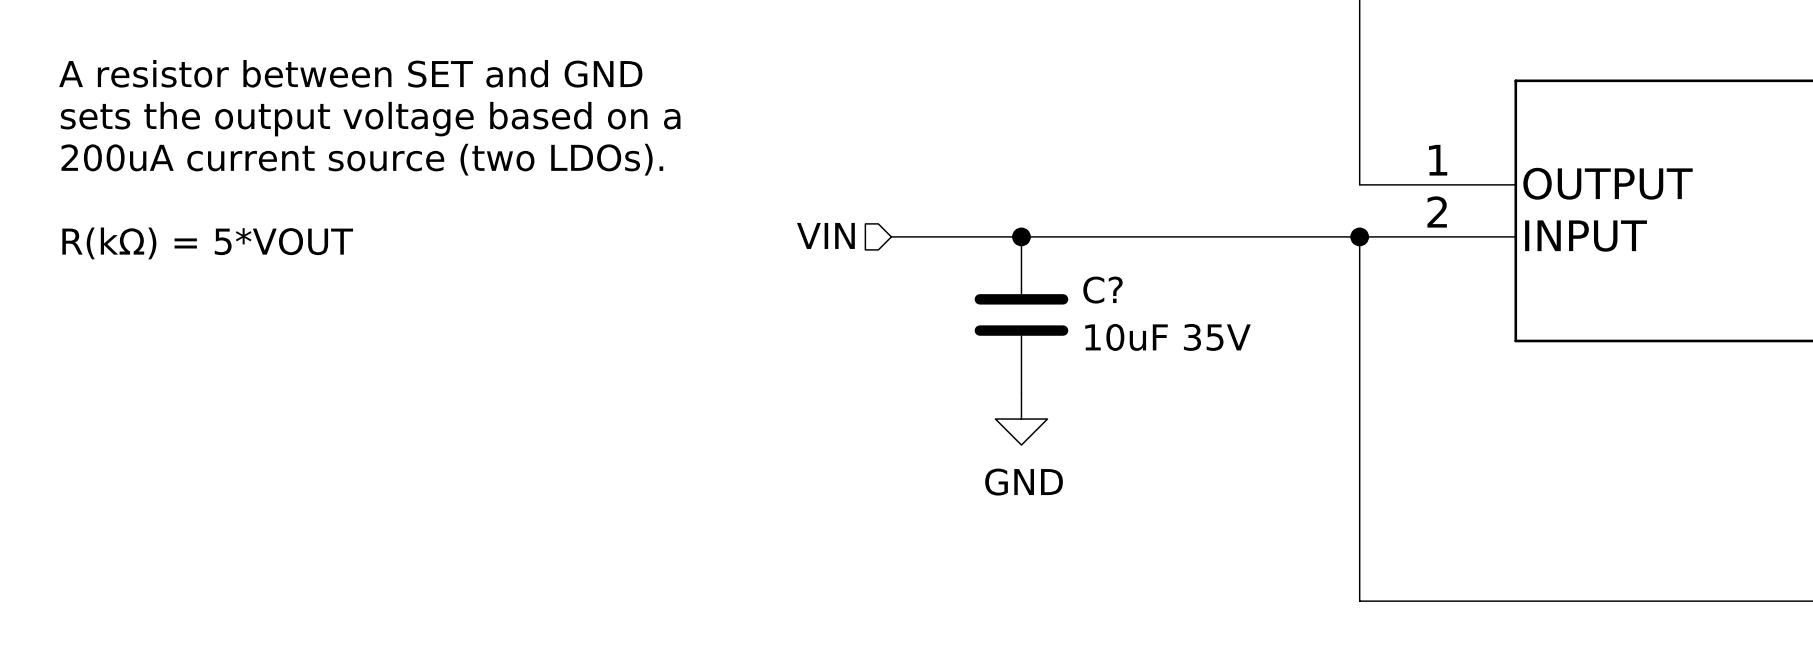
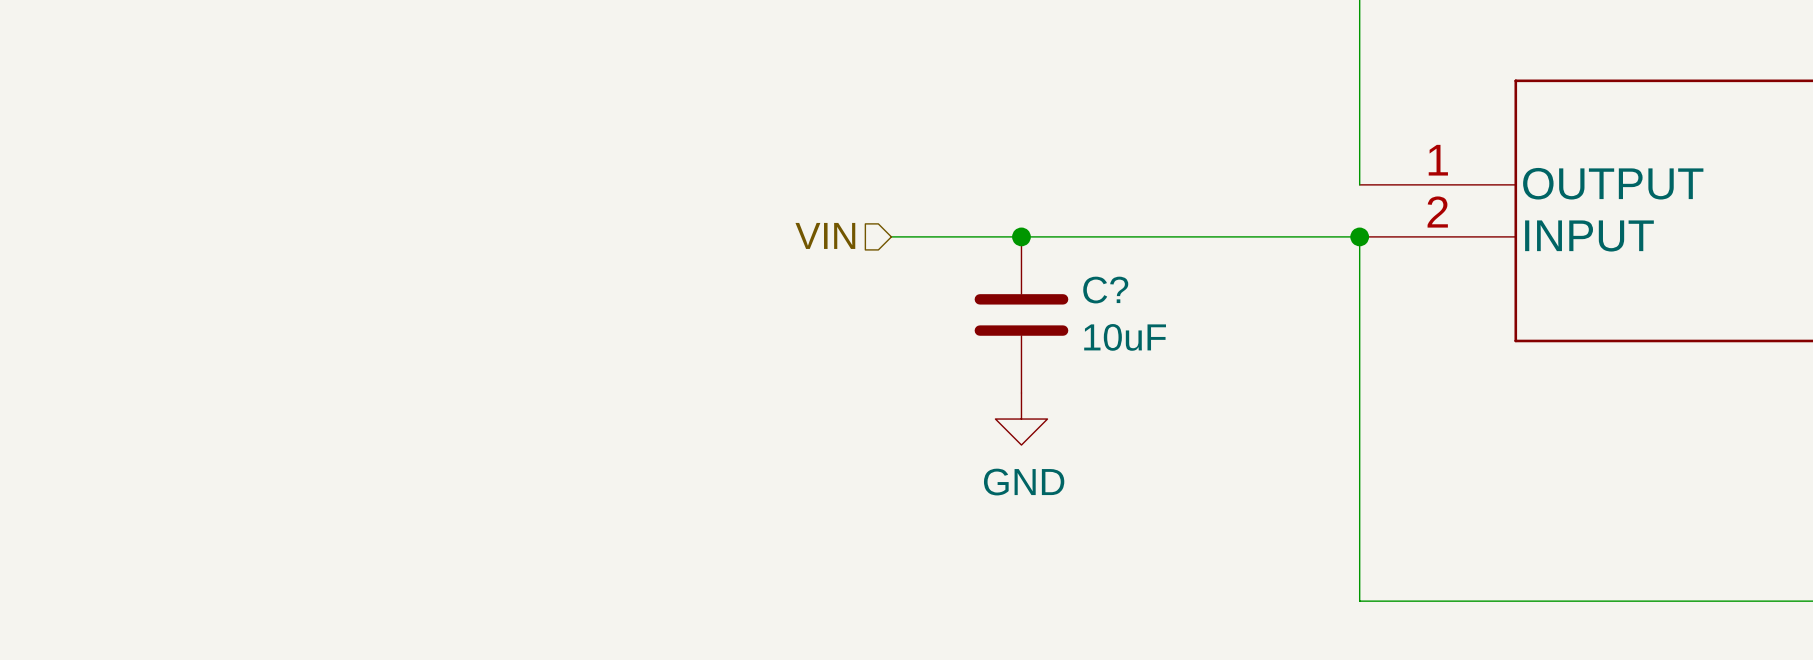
text: A resistor between SET and GND (350, 73) -> none
text: sets the output voltage based on a (370, 119) -> none
text: 200uA current source (two LDOs). (362, 159) -> none
text: R(kΩ) = 5*VOUT (207, 243) -> none
C? value: 10uF 35V (1167, 337) -> 10uF (1125, 337)

